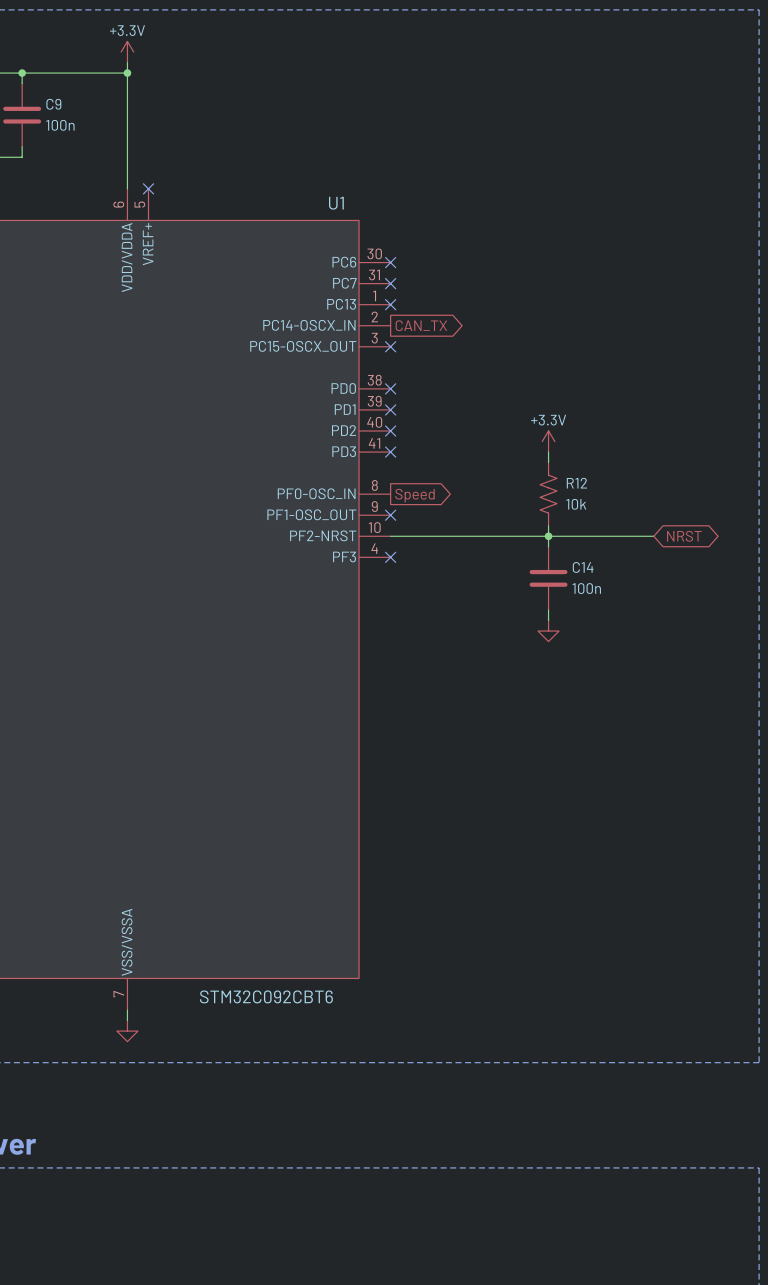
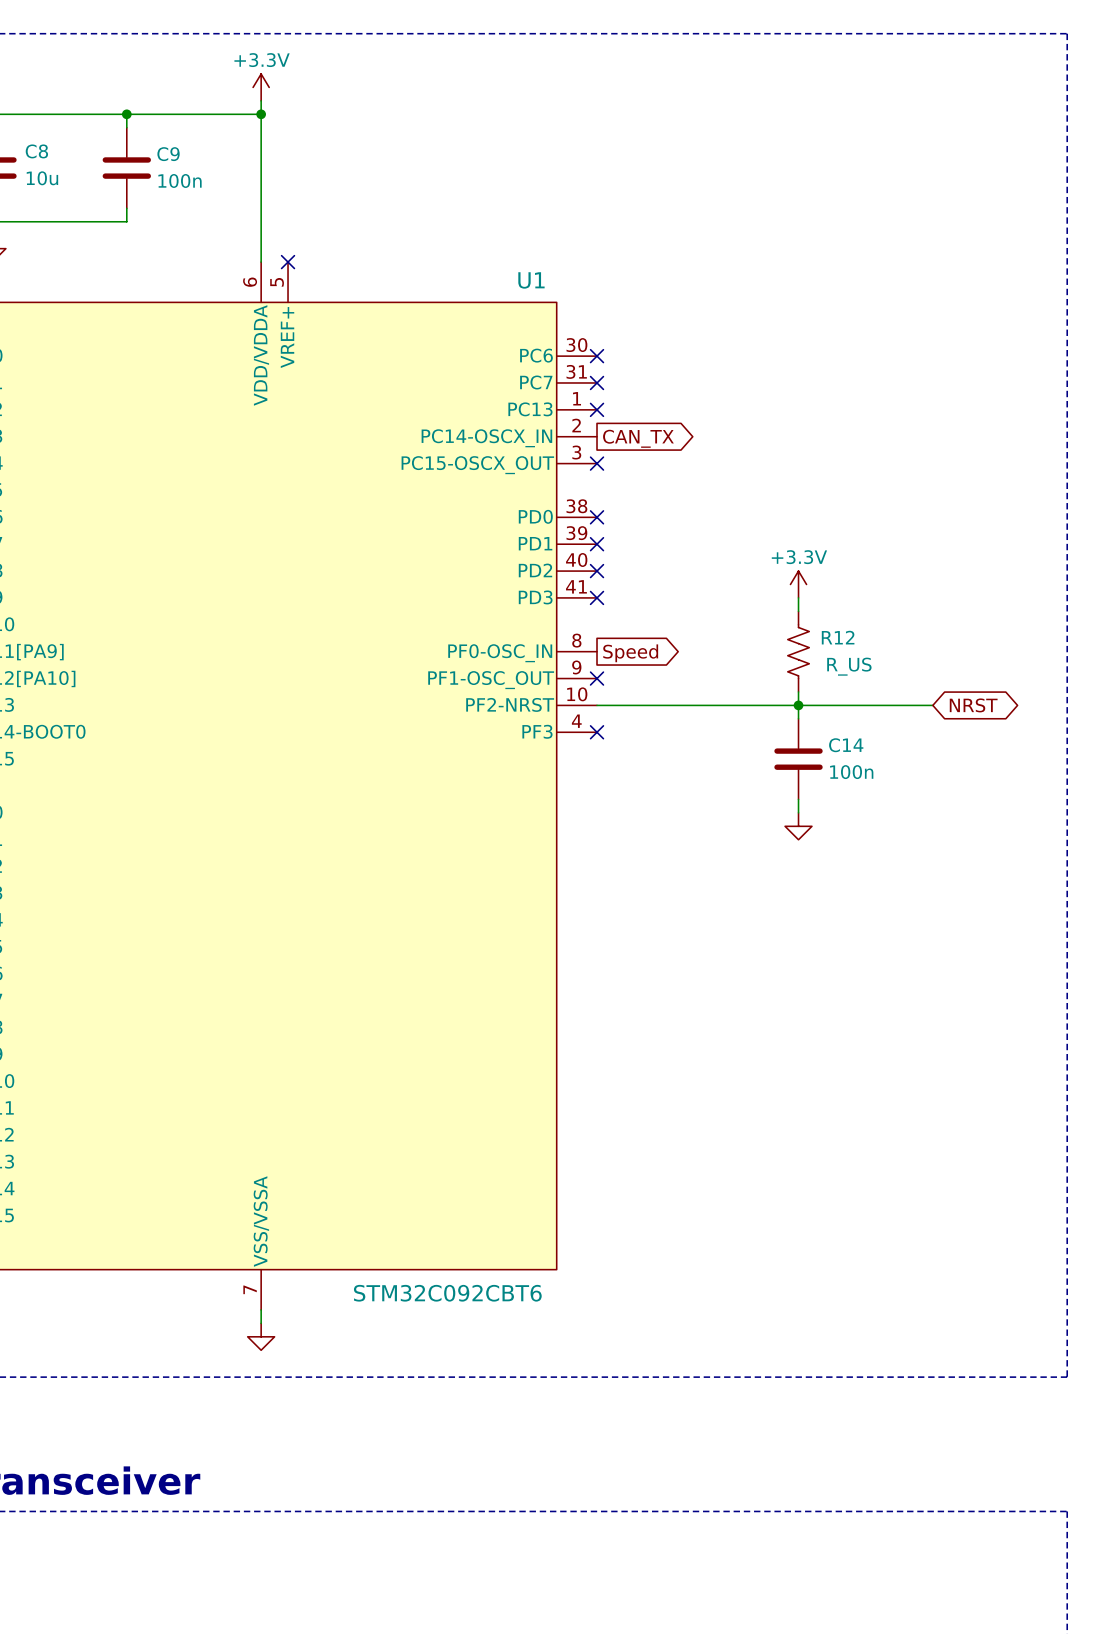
R12 value: 10k (576, 504) -> R_US (849, 666)

